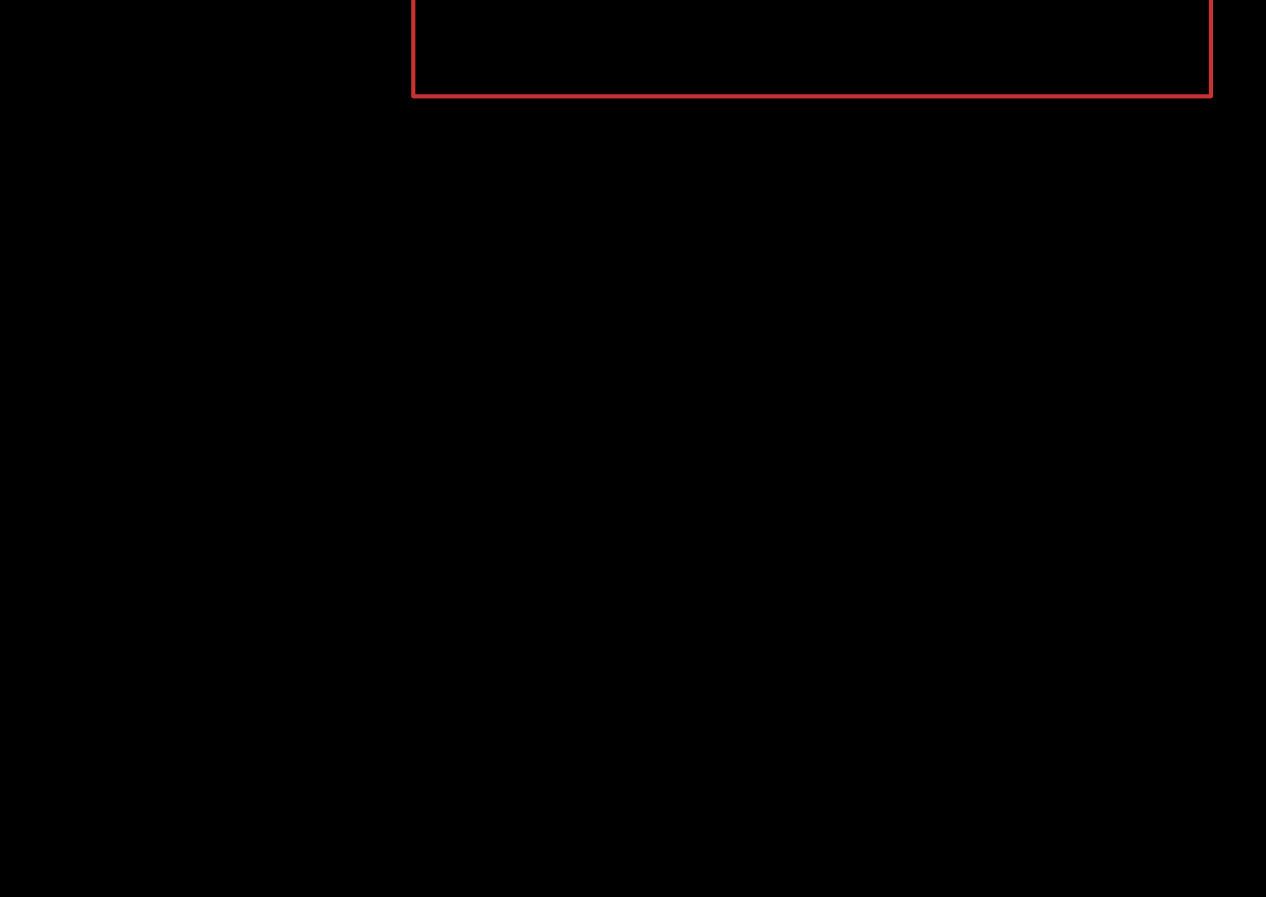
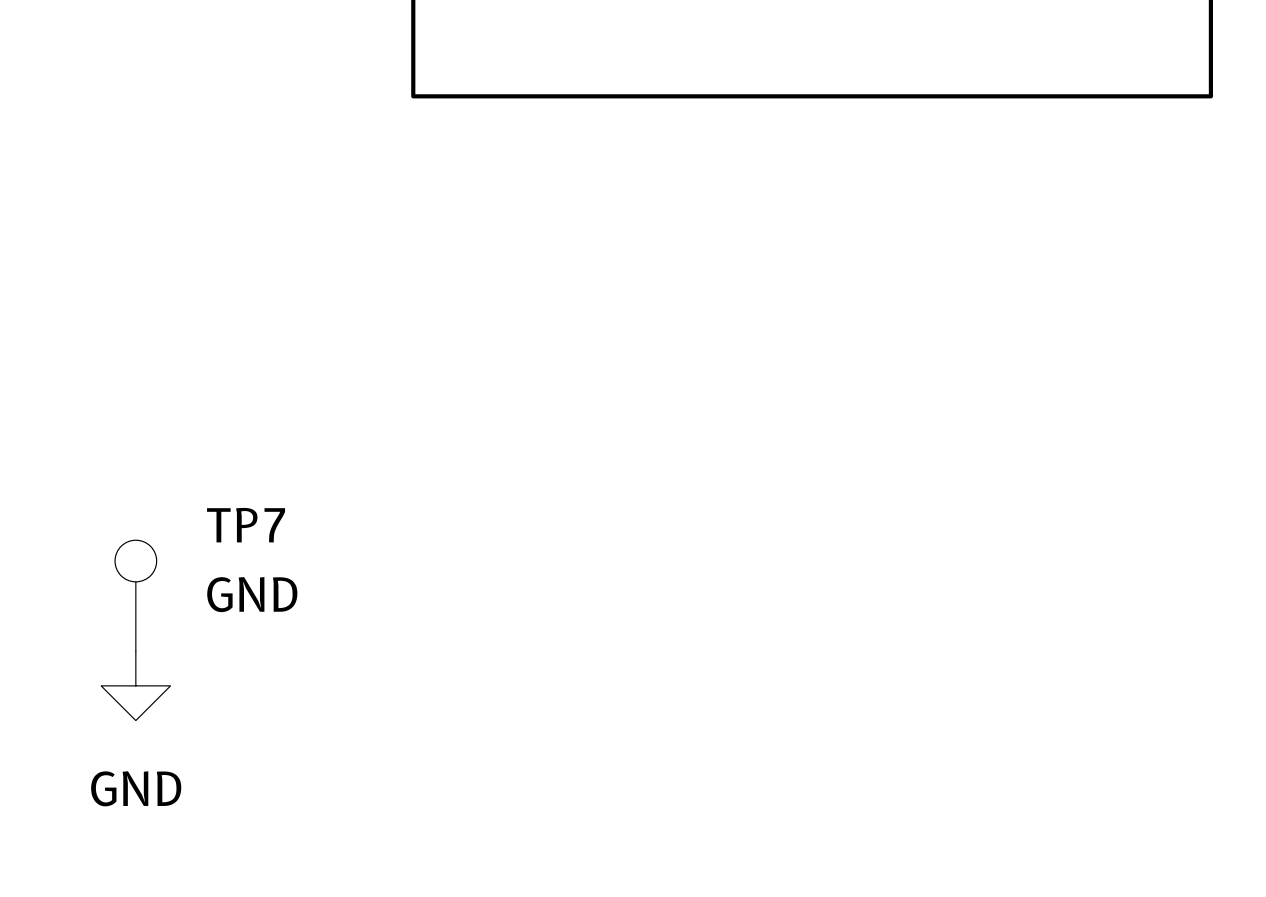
TP7: none -> GND (135, 595)
power symbol: none -> GND (135, 685)

